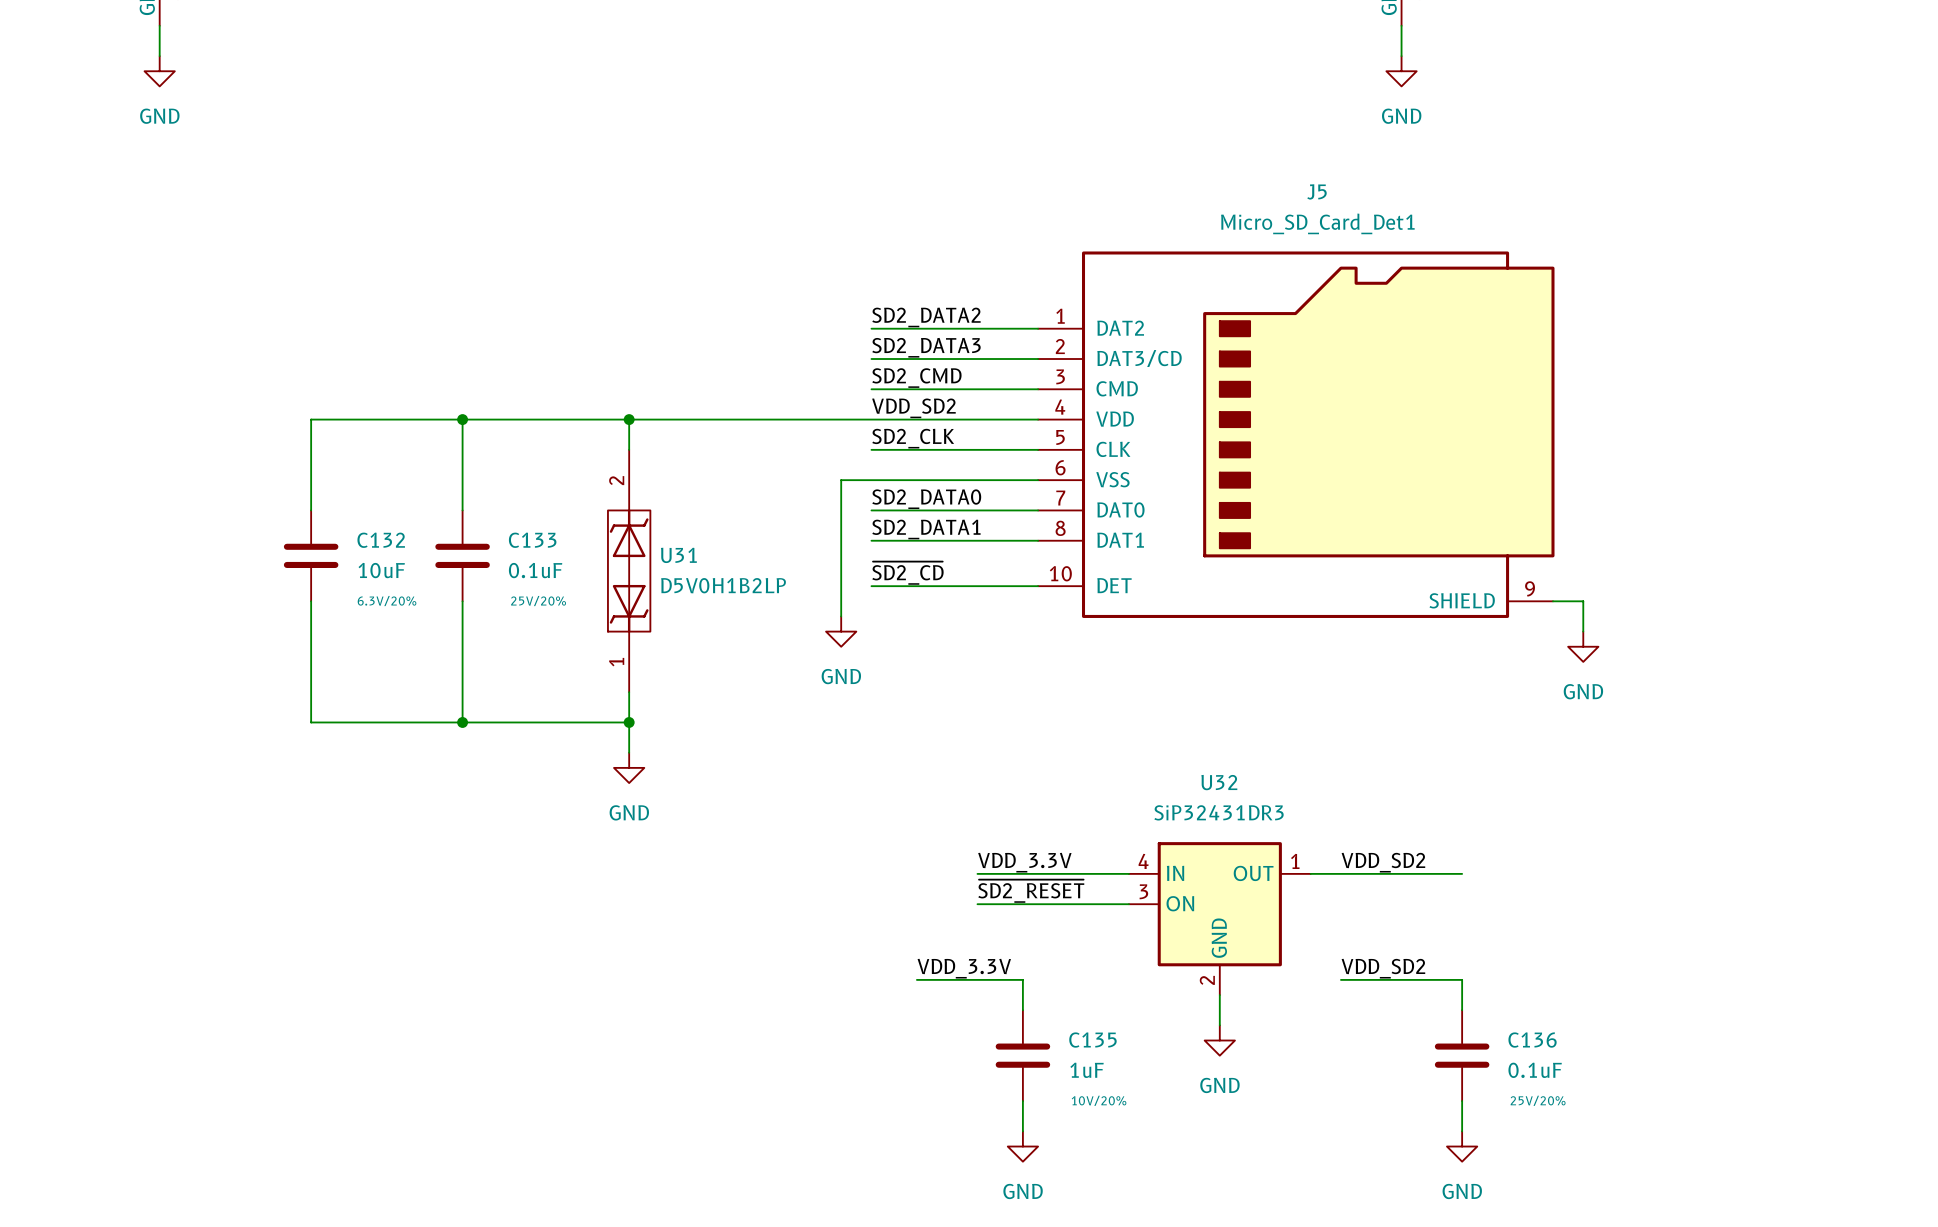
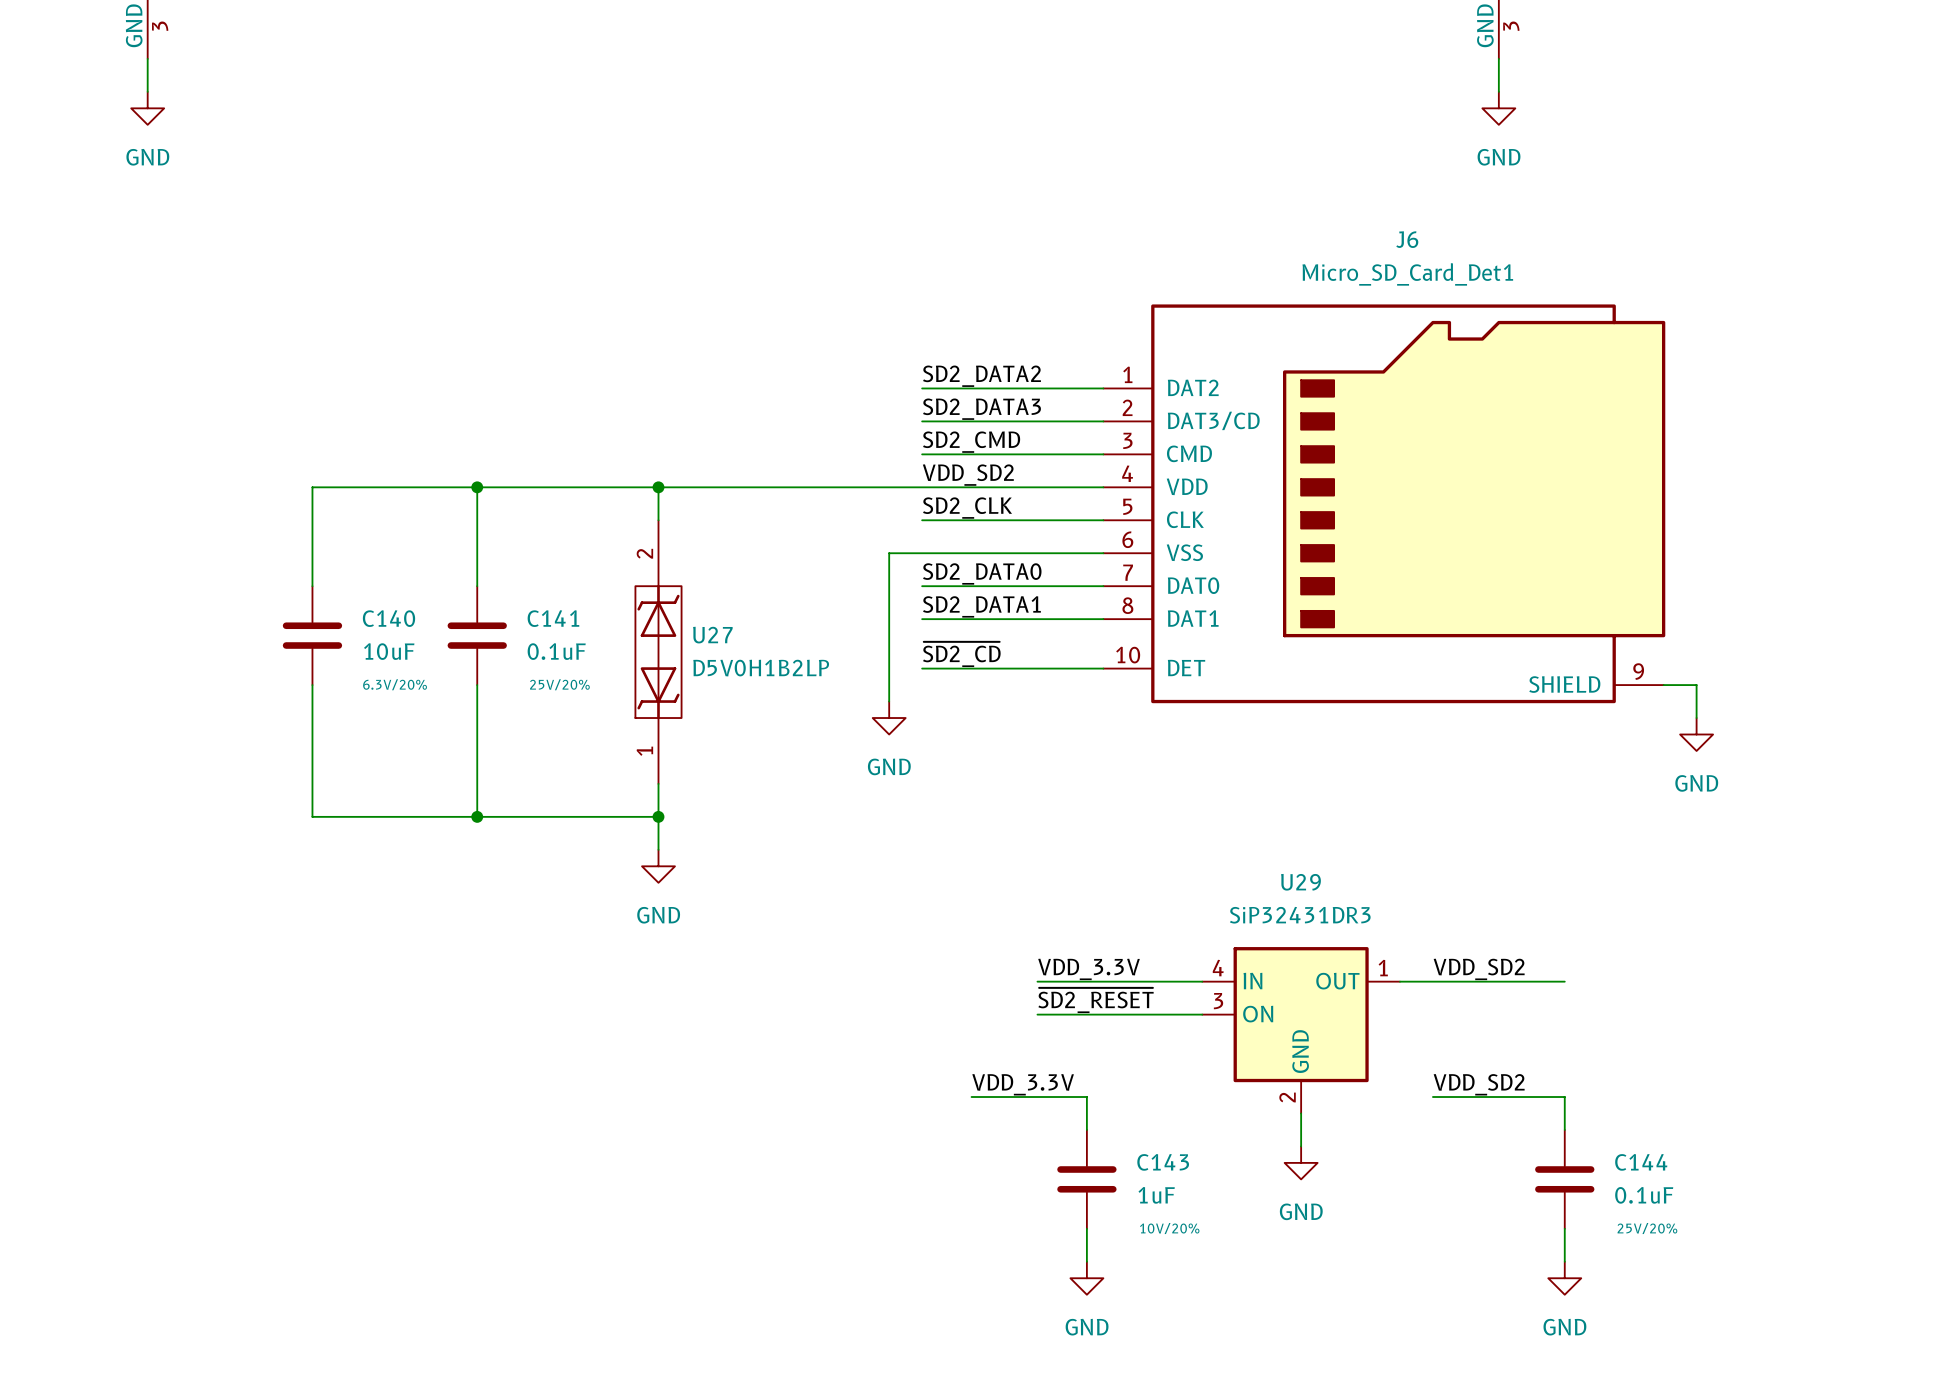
J5 name: J5 (1317, 191) -> J6 (1407, 239)
C132 name: C132 (381, 540) -> C140 (388, 618)
C133 name: C133 (532, 540) -> C141 (553, 618)
U31 name: U31 (678, 555) -> U27 (712, 635)
U32 name: U32 (1219, 782) -> U29 (1300, 882)
C135 name: C135 (1092, 1040) -> C143 (1163, 1162)
C136 name: C136 (1532, 1040) -> C144 (1641, 1162)

